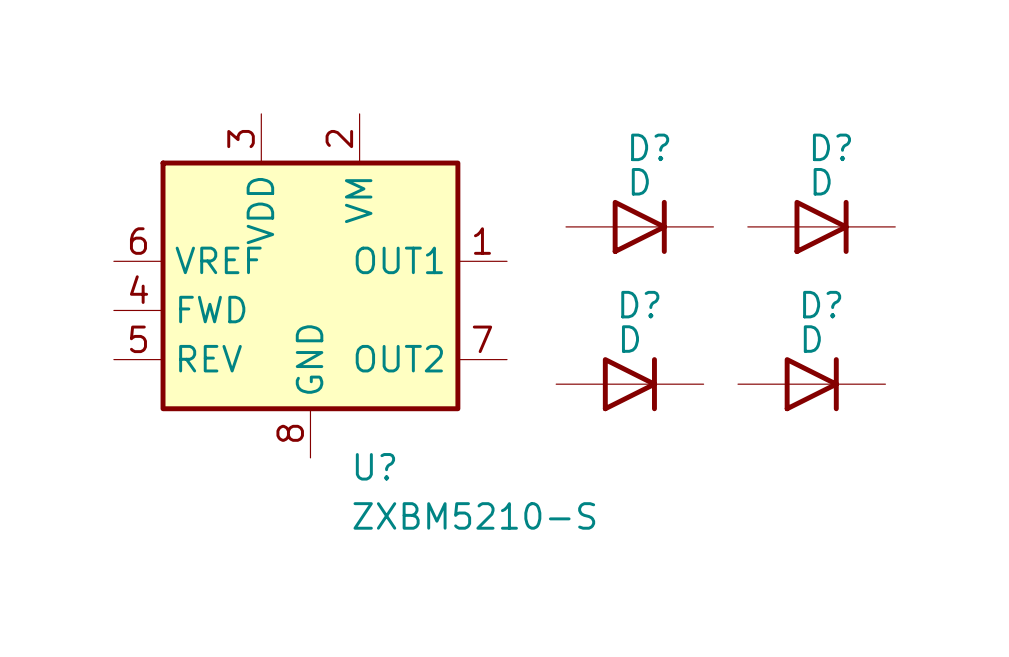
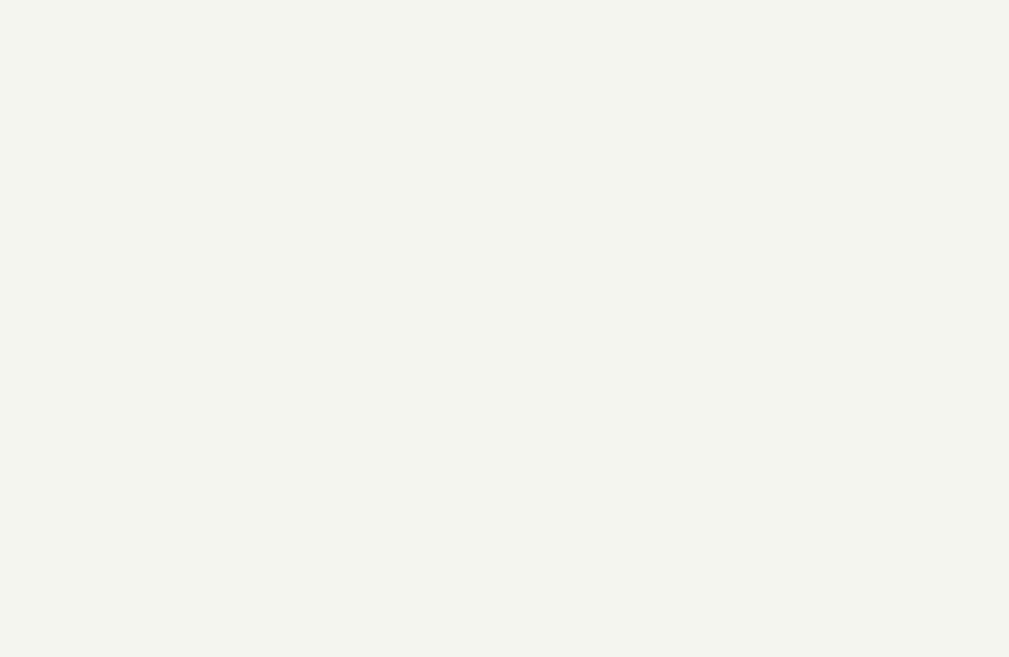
D?: D (639, 226) -> none
D?: D (821, 226) -> none
U?: ZXBM5210-S (310, 285) -> none
D?: D (629, 384) -> none
D?: D (811, 384) -> none

